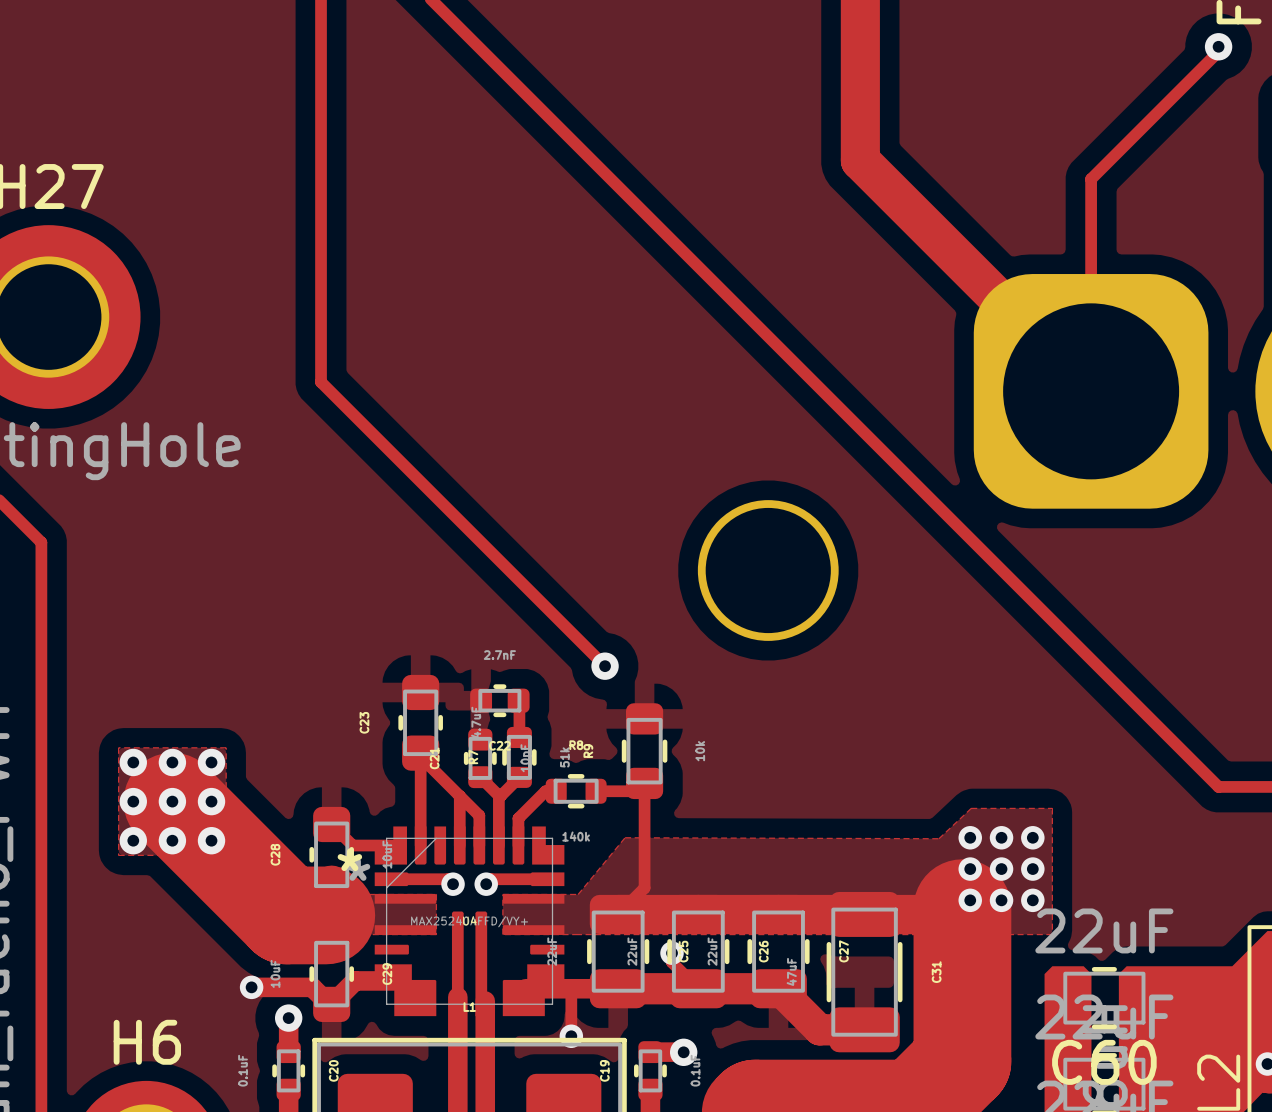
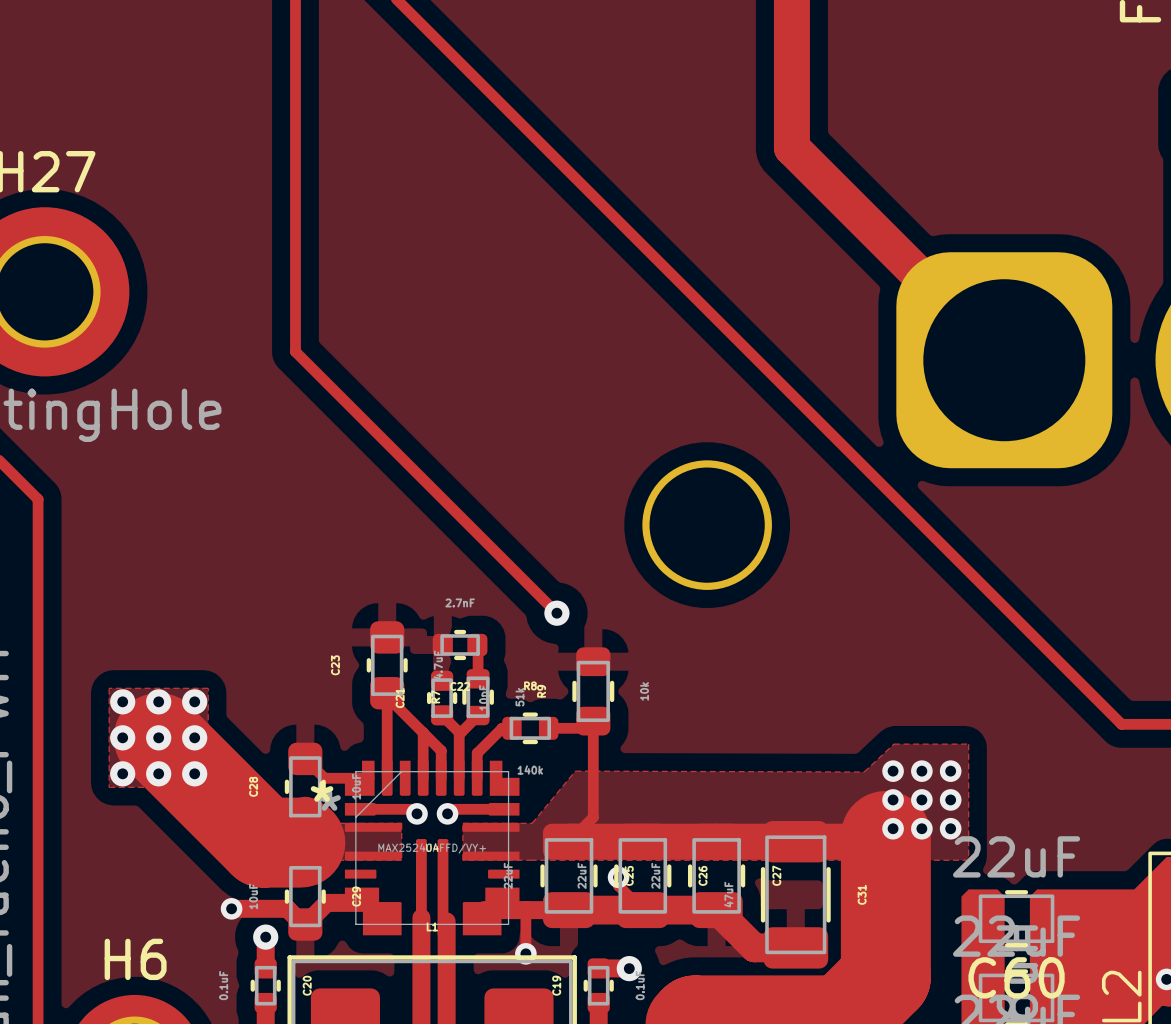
track: (1218, 46) (1218, 51) (1091, 179) (1091, 391) -> none
via: (1218, 46) -> none

